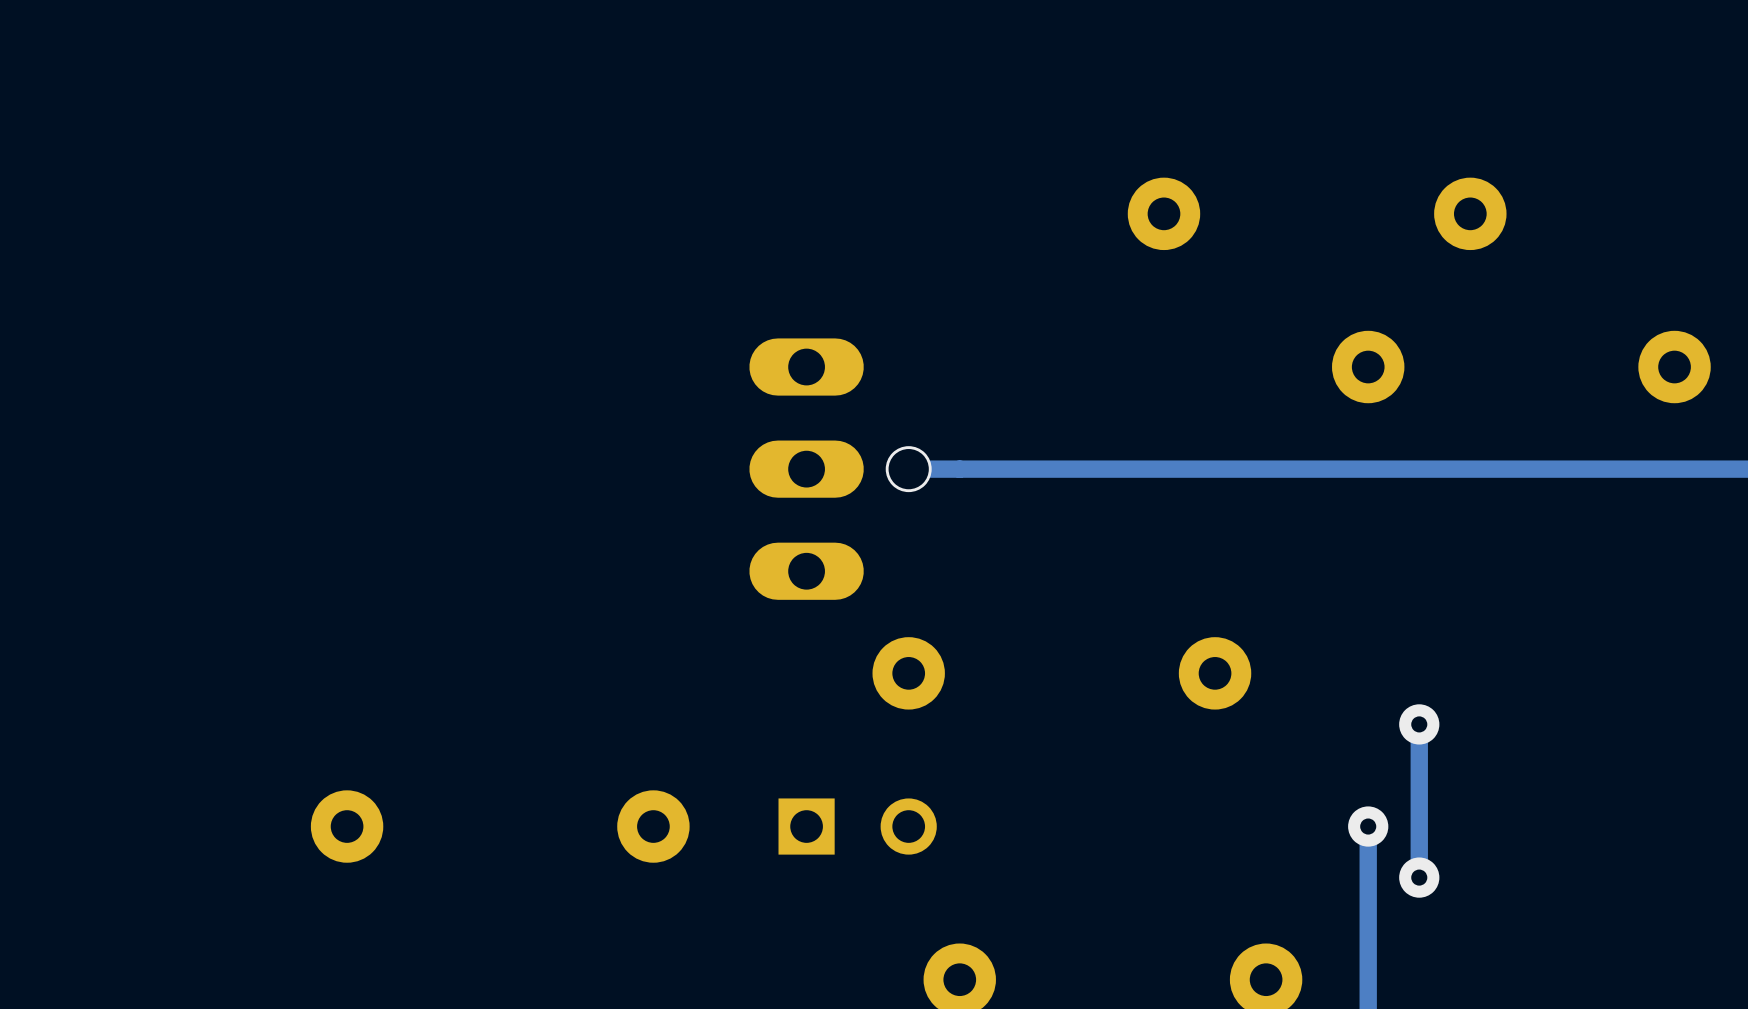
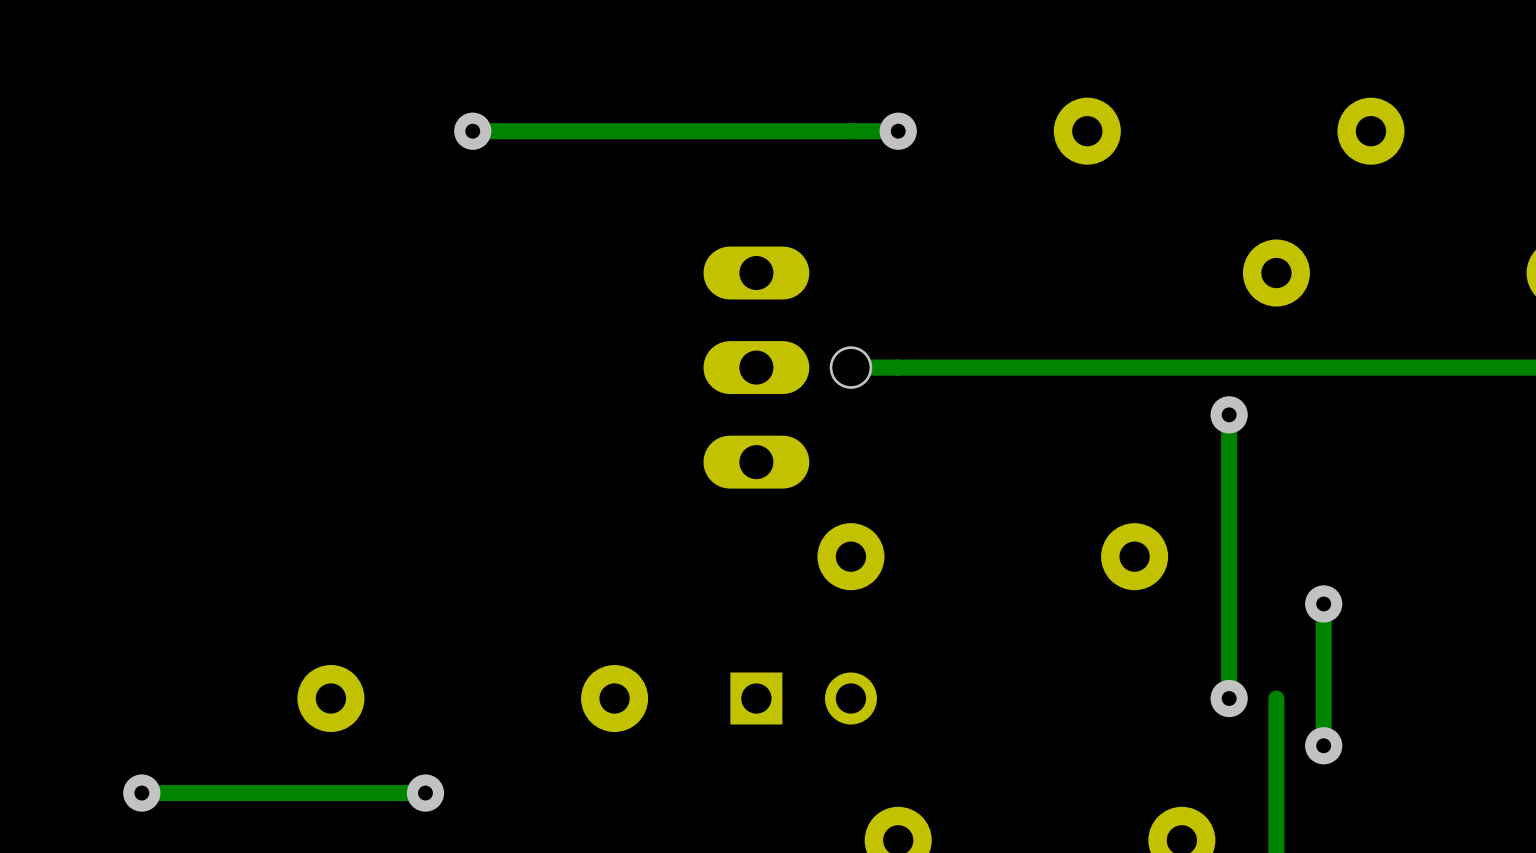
via: none -> (472, 131)
track: none -> (898, 131) (472, 131)
via: none -> (898, 131)
track: none -> (1229, 414) (1229, 698)
via: none -> (1229, 414)
via position: (1368, 826) -> (1229, 698)
via: none -> (141, 793)
track: none -> (425, 793) (141, 793)
via: none -> (425, 793)

